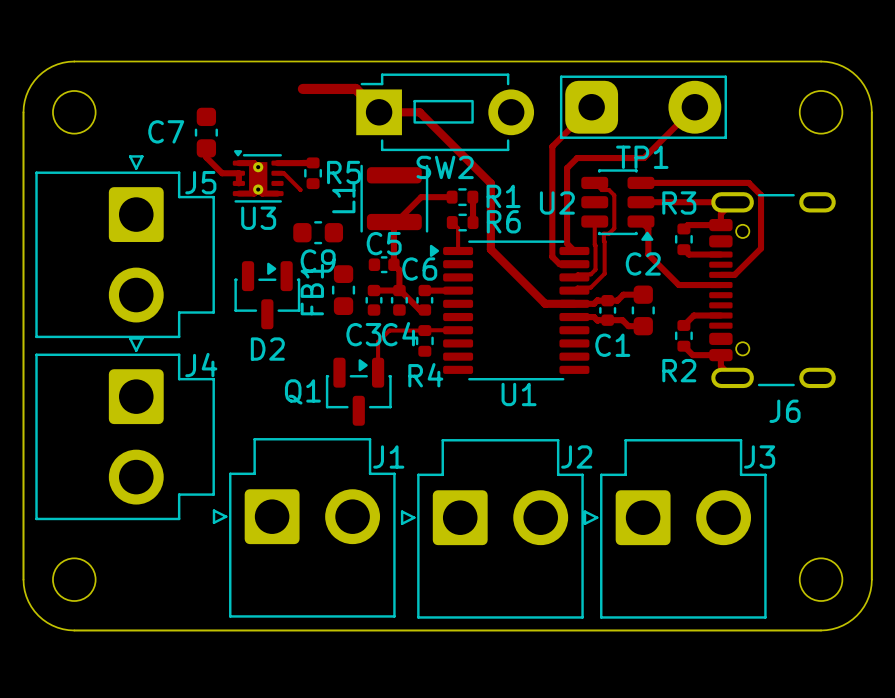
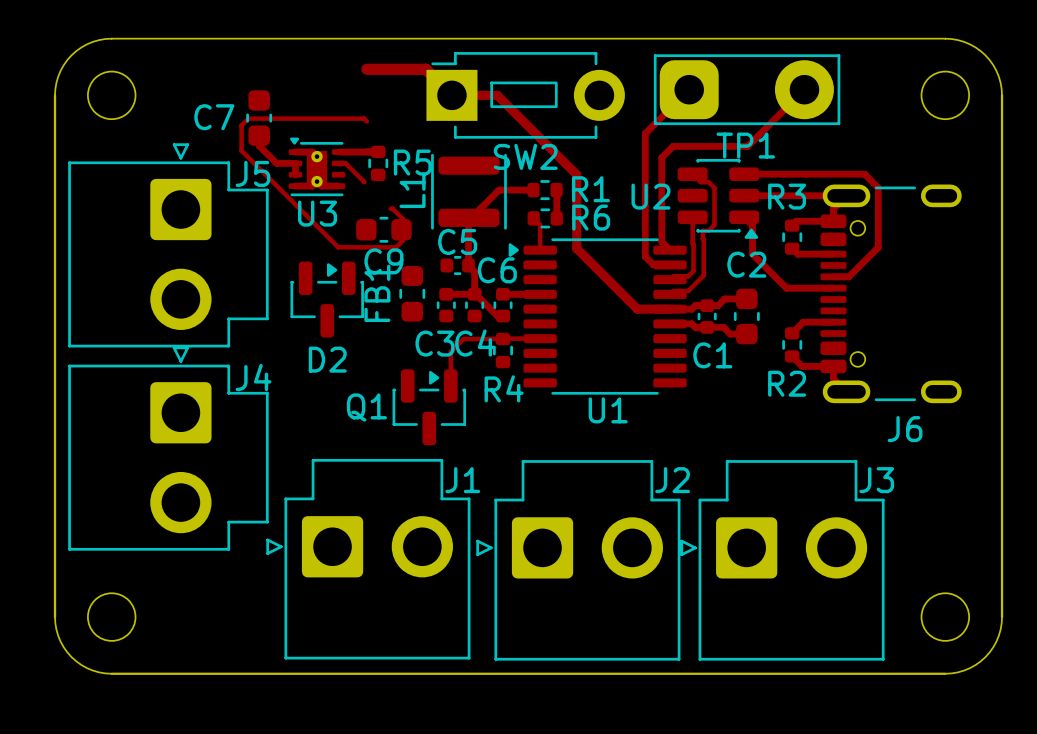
top track: none -> (366, 121) (364, 118) (248, 118) (241, 125) (241, 150) (338, 247) (396, 247) (402, 240) (402, 219) (390, 208)

